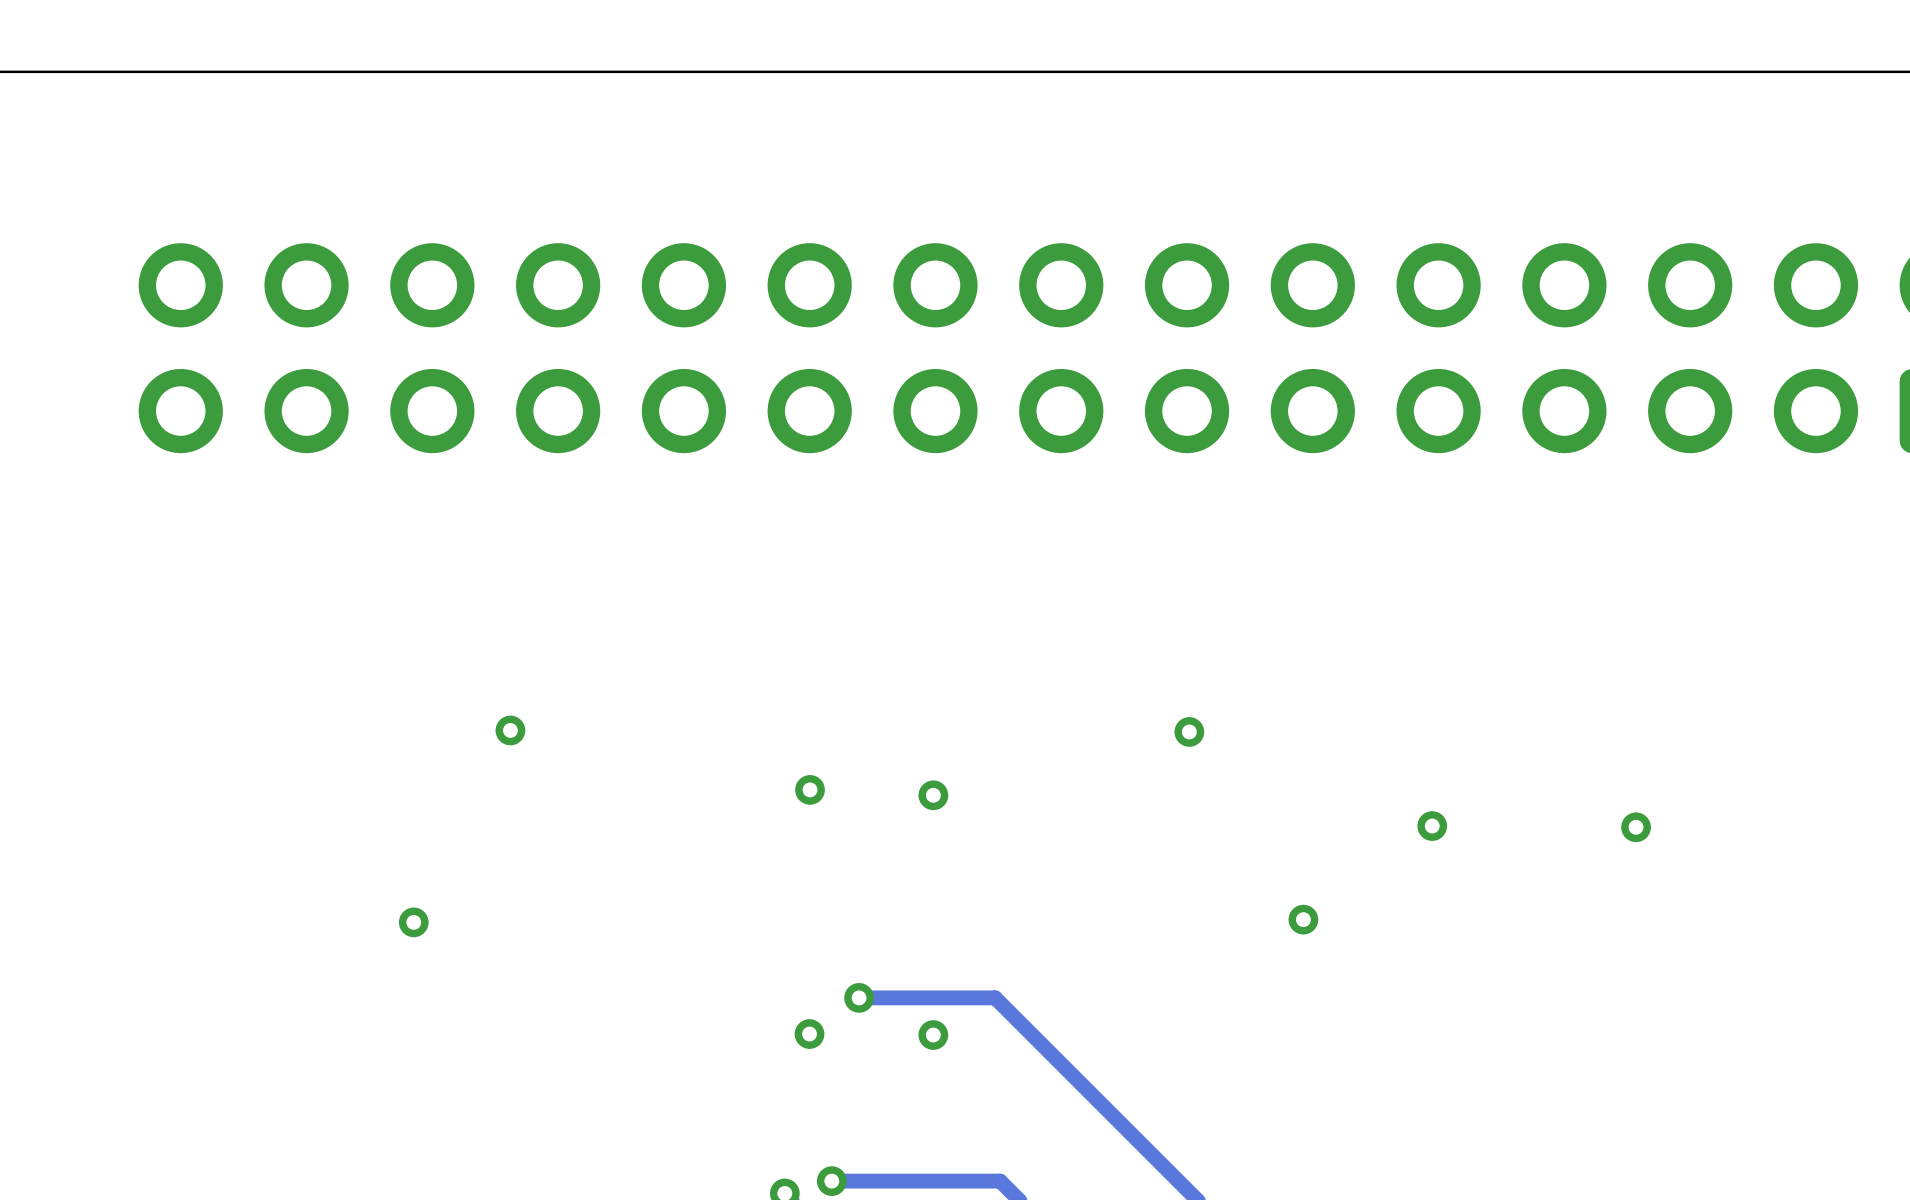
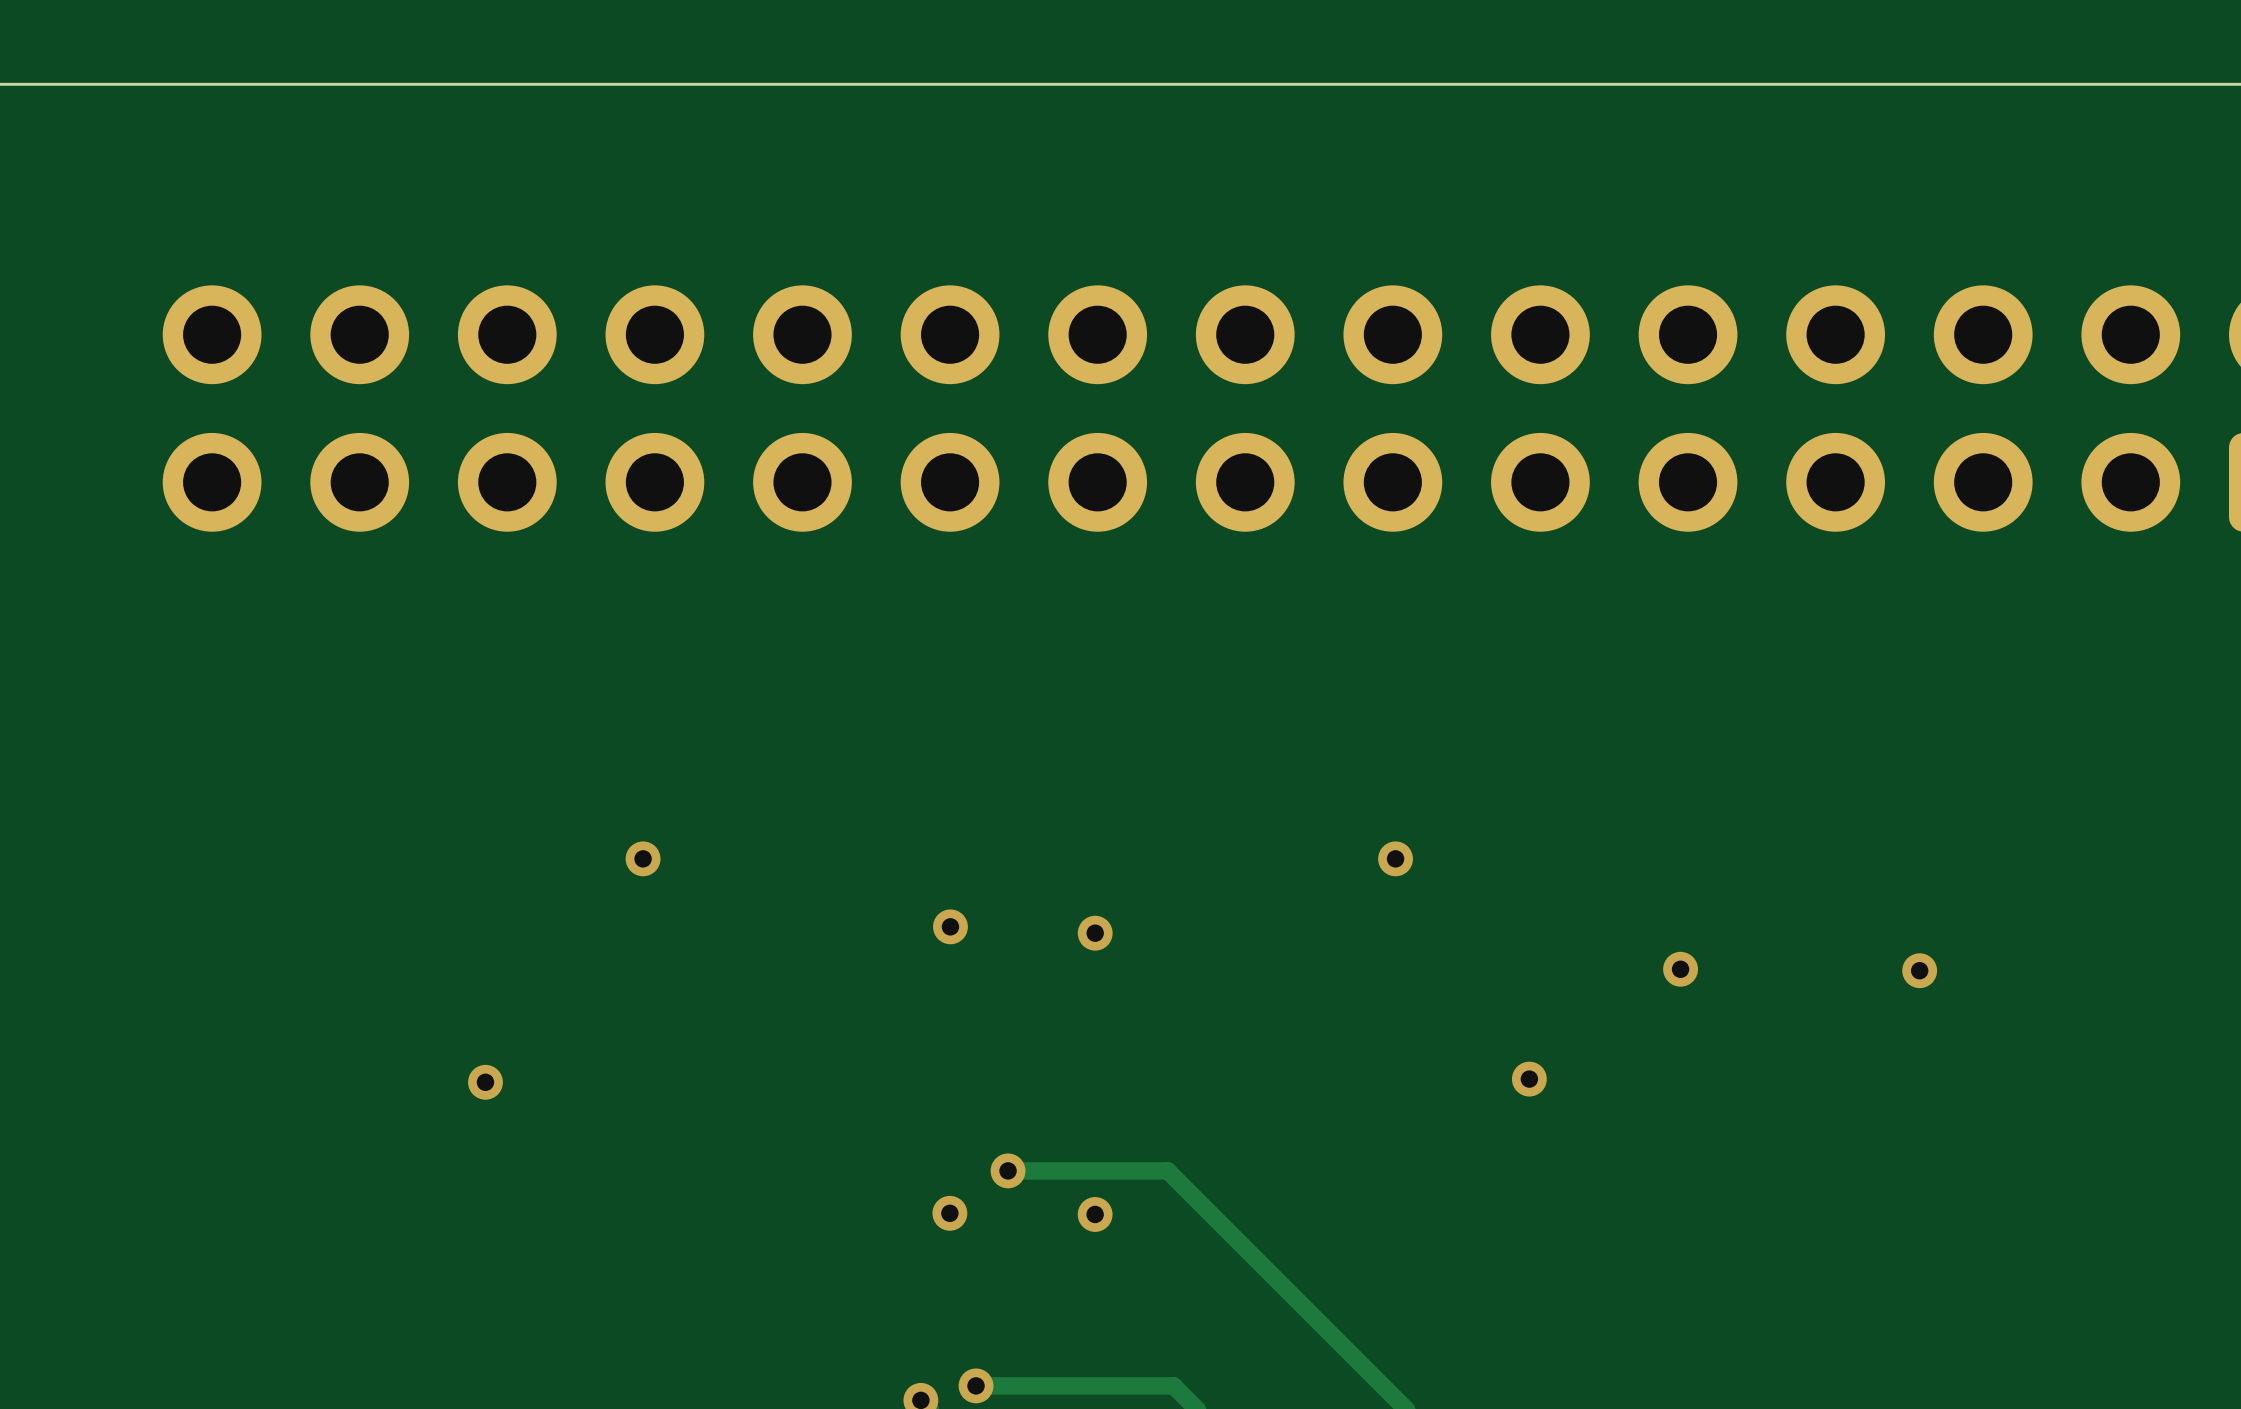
via position: (510, 730) -> (643, 858)

